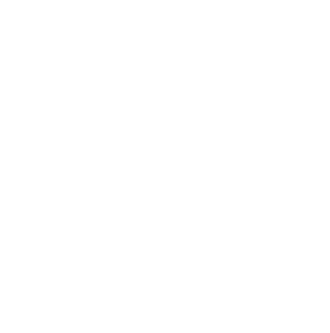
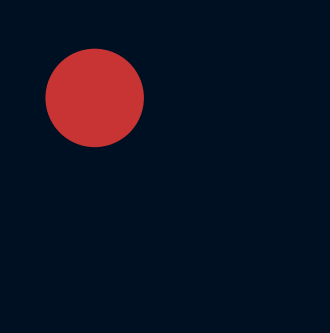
part: none -> (94, 97)

